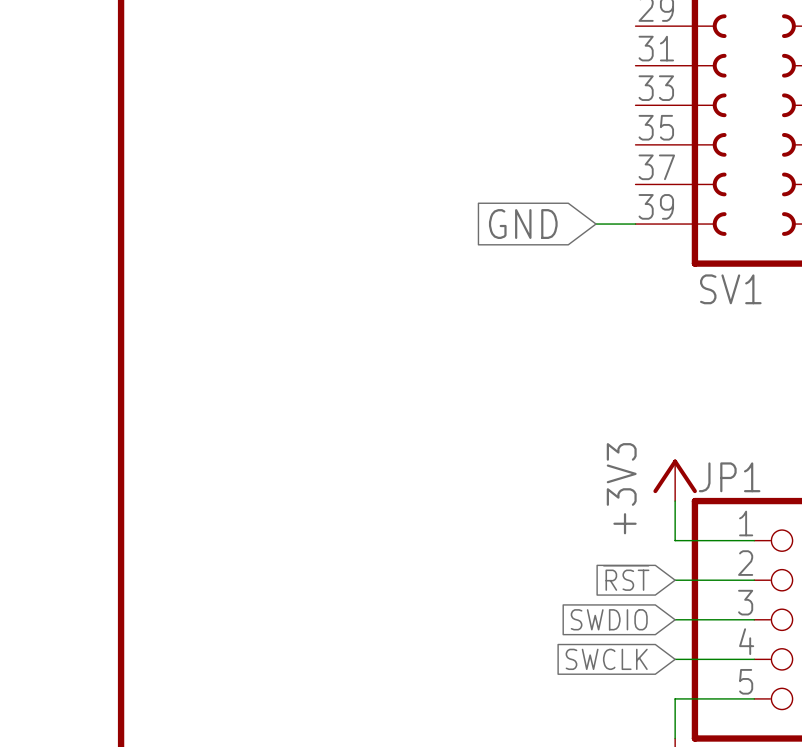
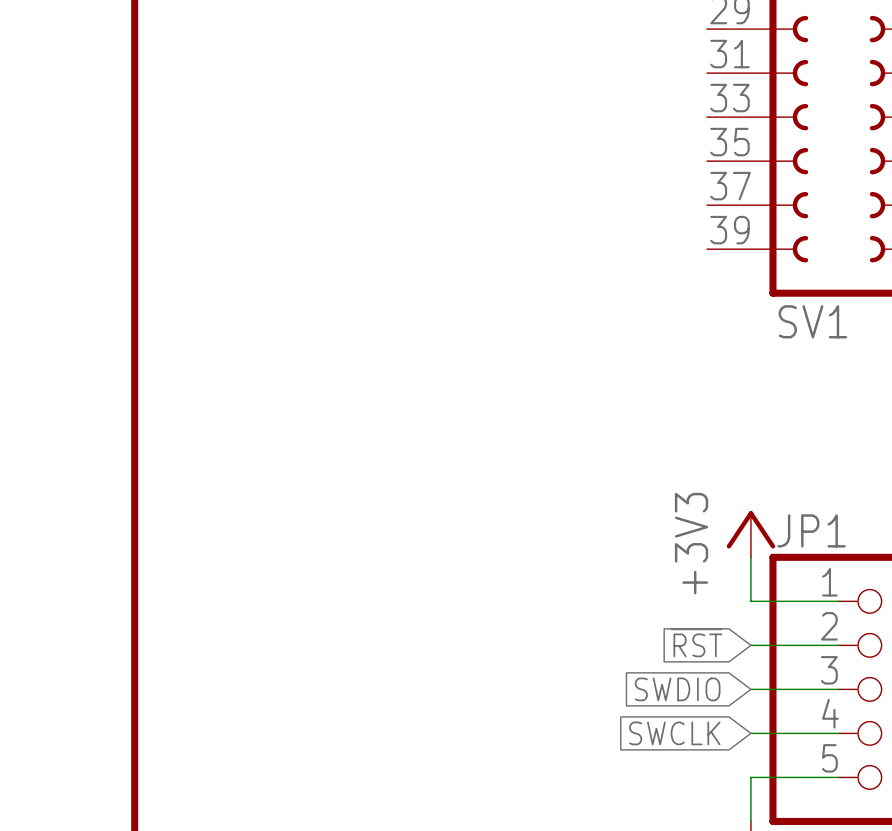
global label: GND (523, 224) -> none
wire: (595, 224) (635, 224) -> none

